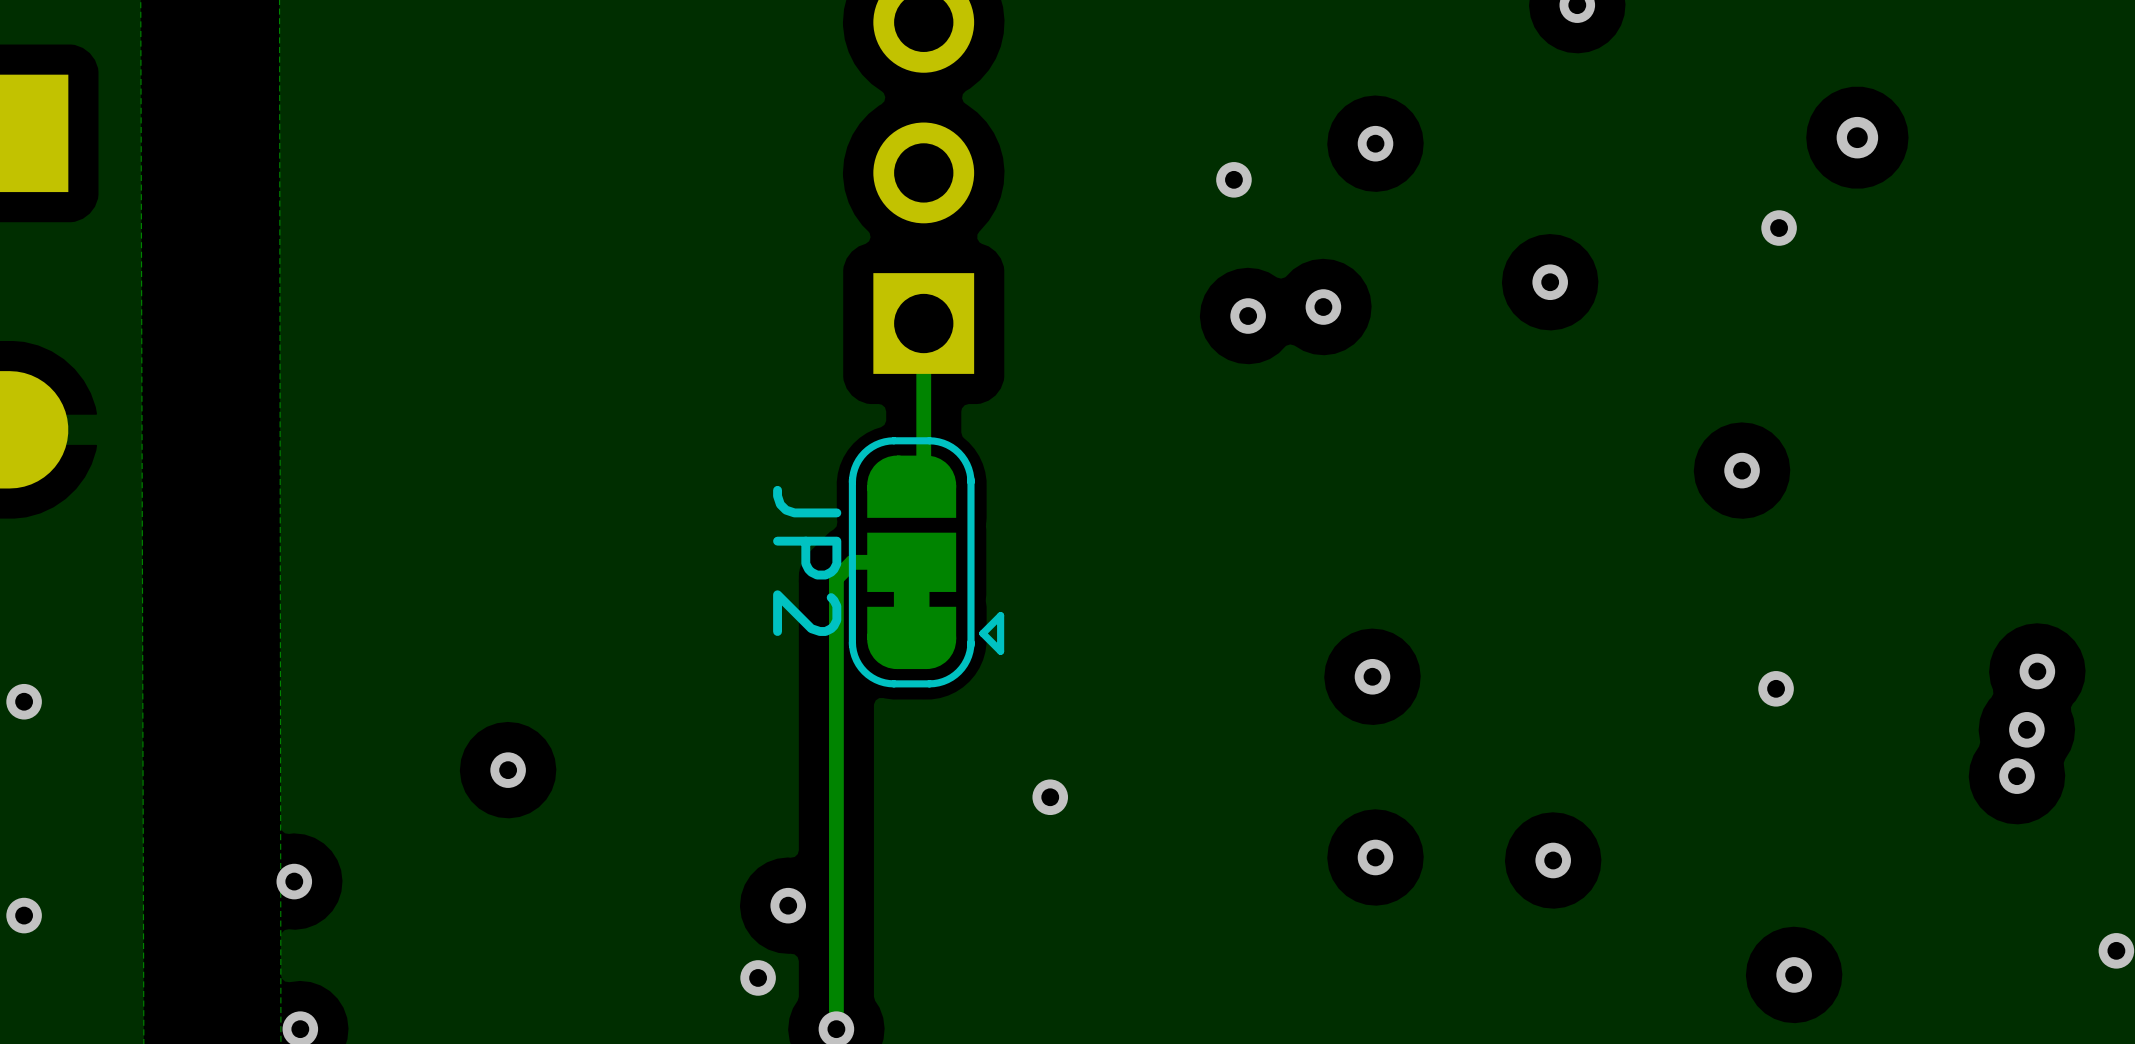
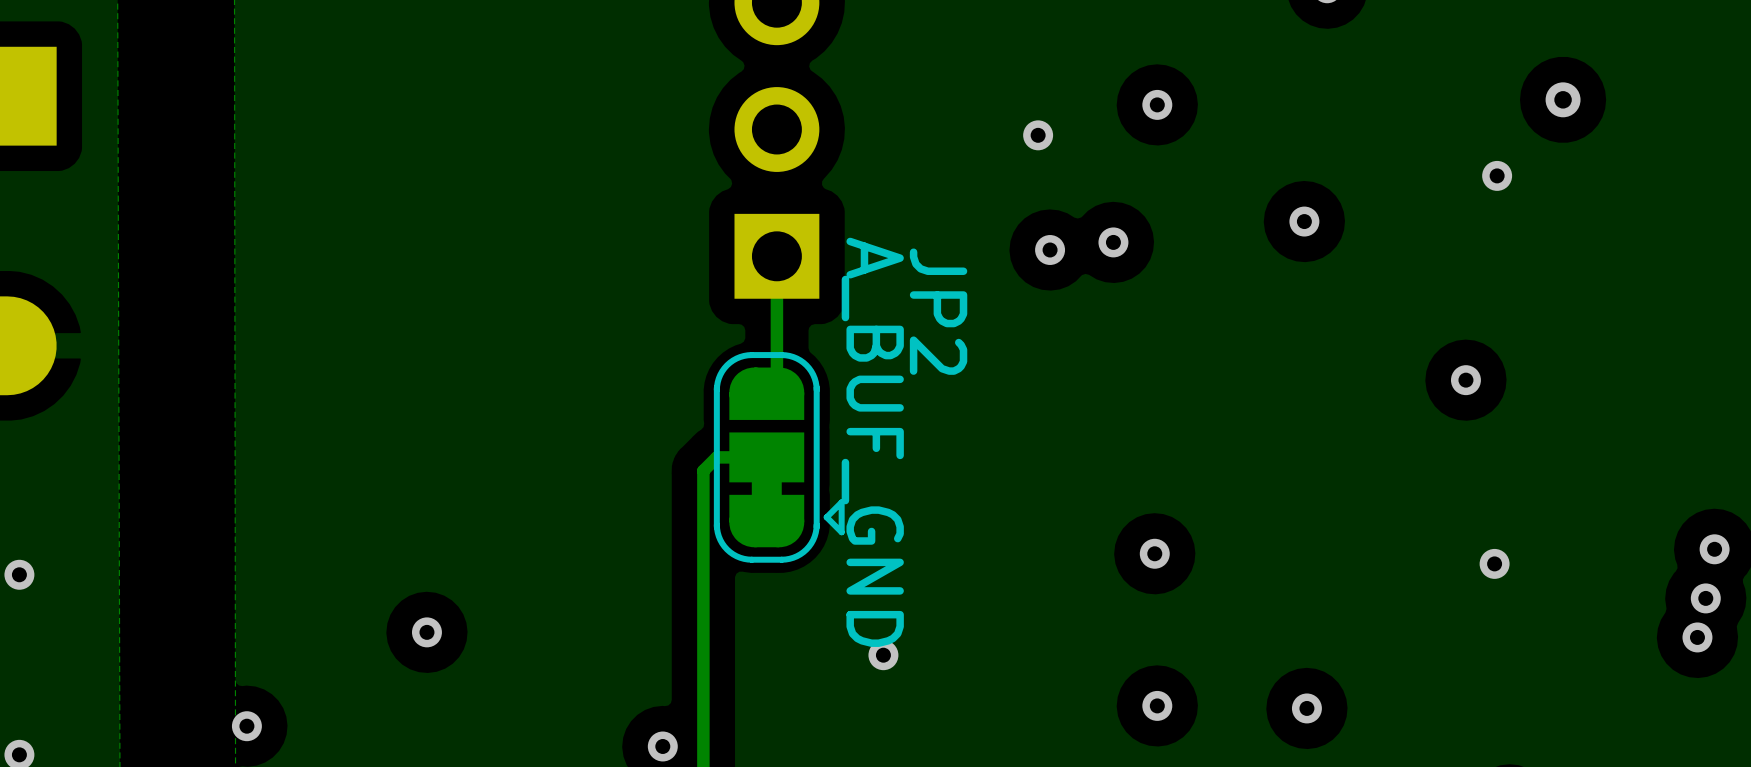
JP2 value: none -> A_BUF_GND (872, 442)
JP2 name position: JP2 (807, 560) -> JP2 (938, 311)

